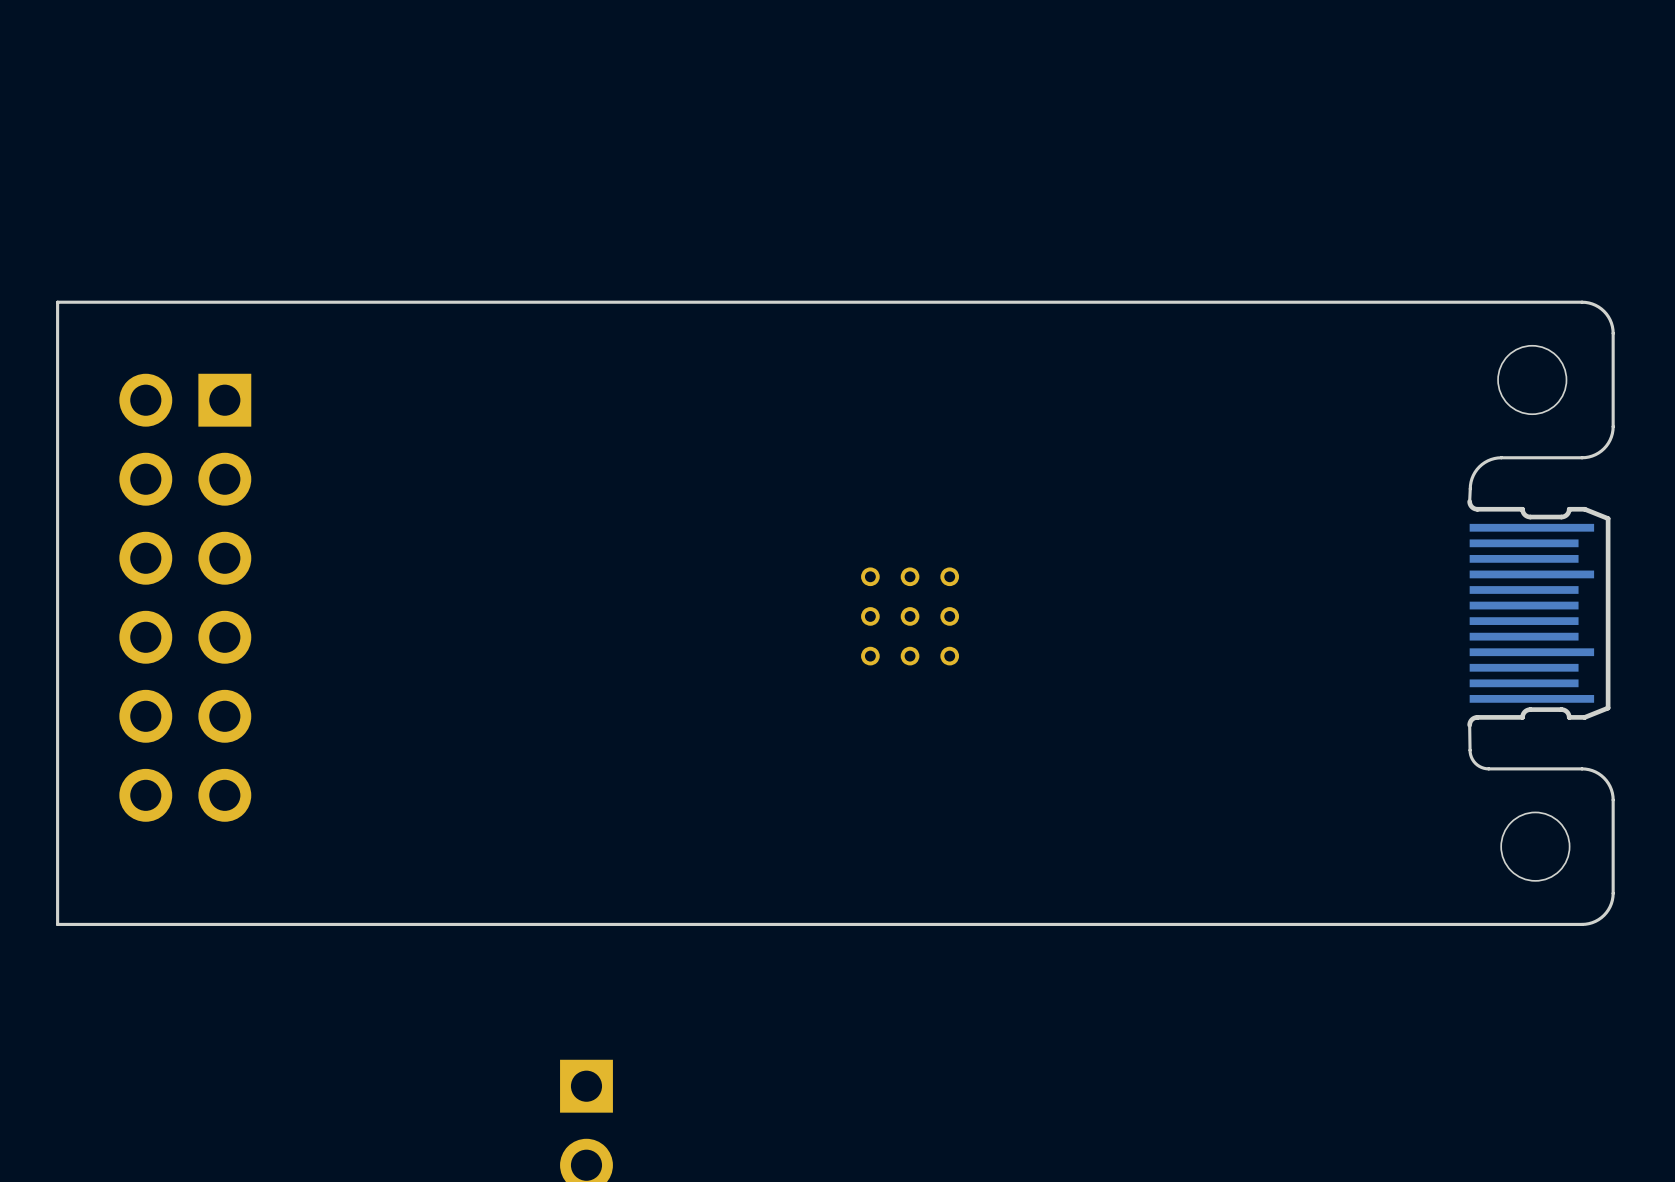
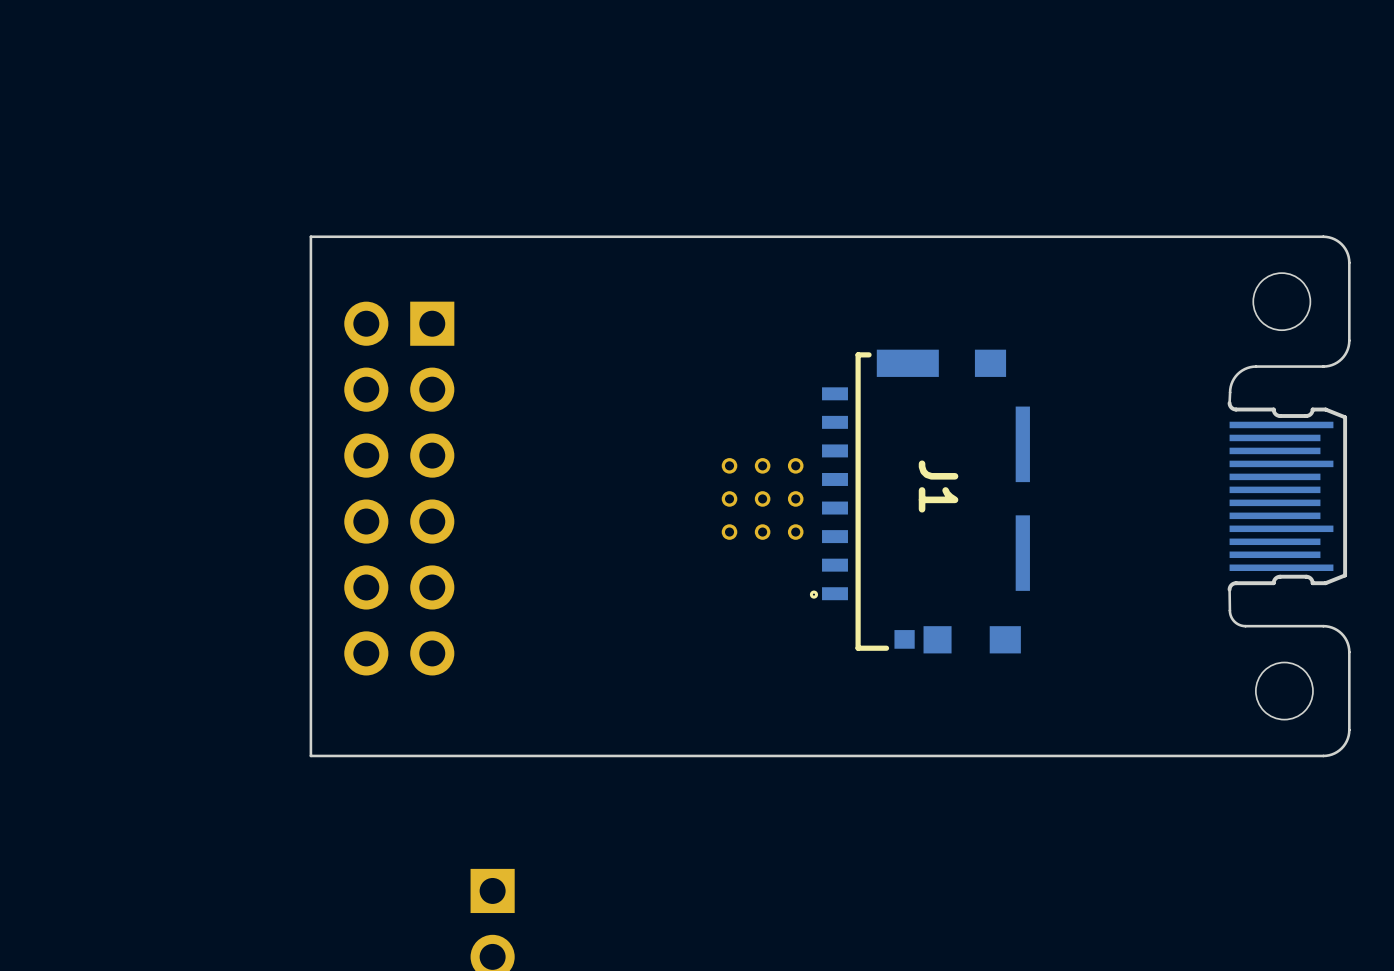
board edge: (368, 302) (57, 302) (57, 924) (368, 924) -> (310, 236) (310, 755)
part position: (185, 597) -> (399, 488)
J1: none -> (919, 501)

